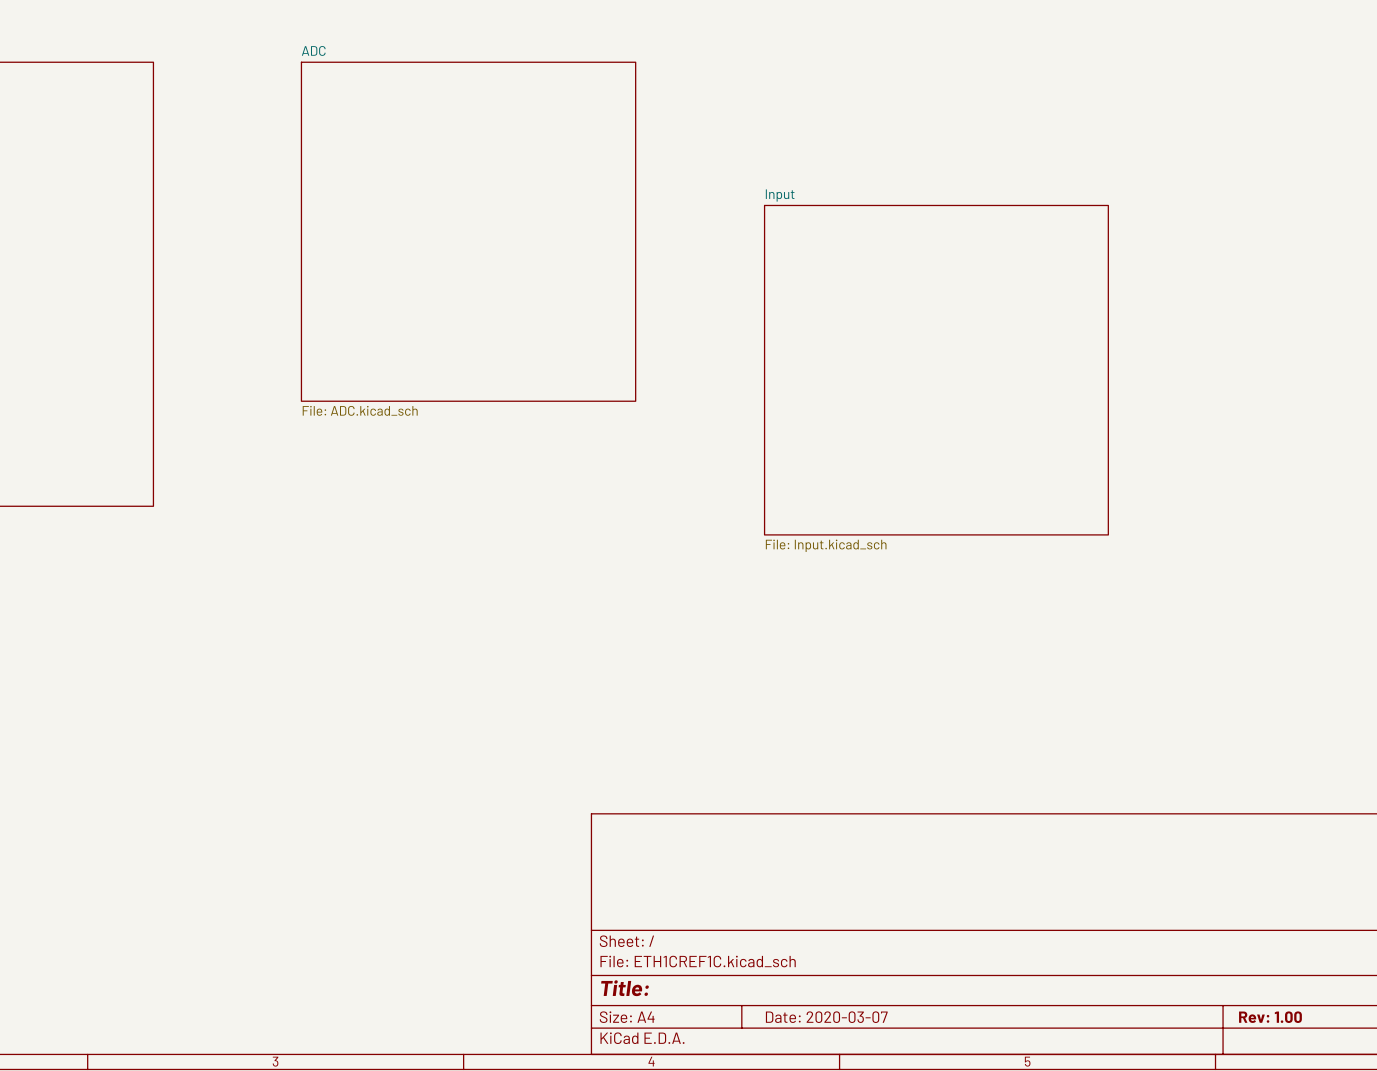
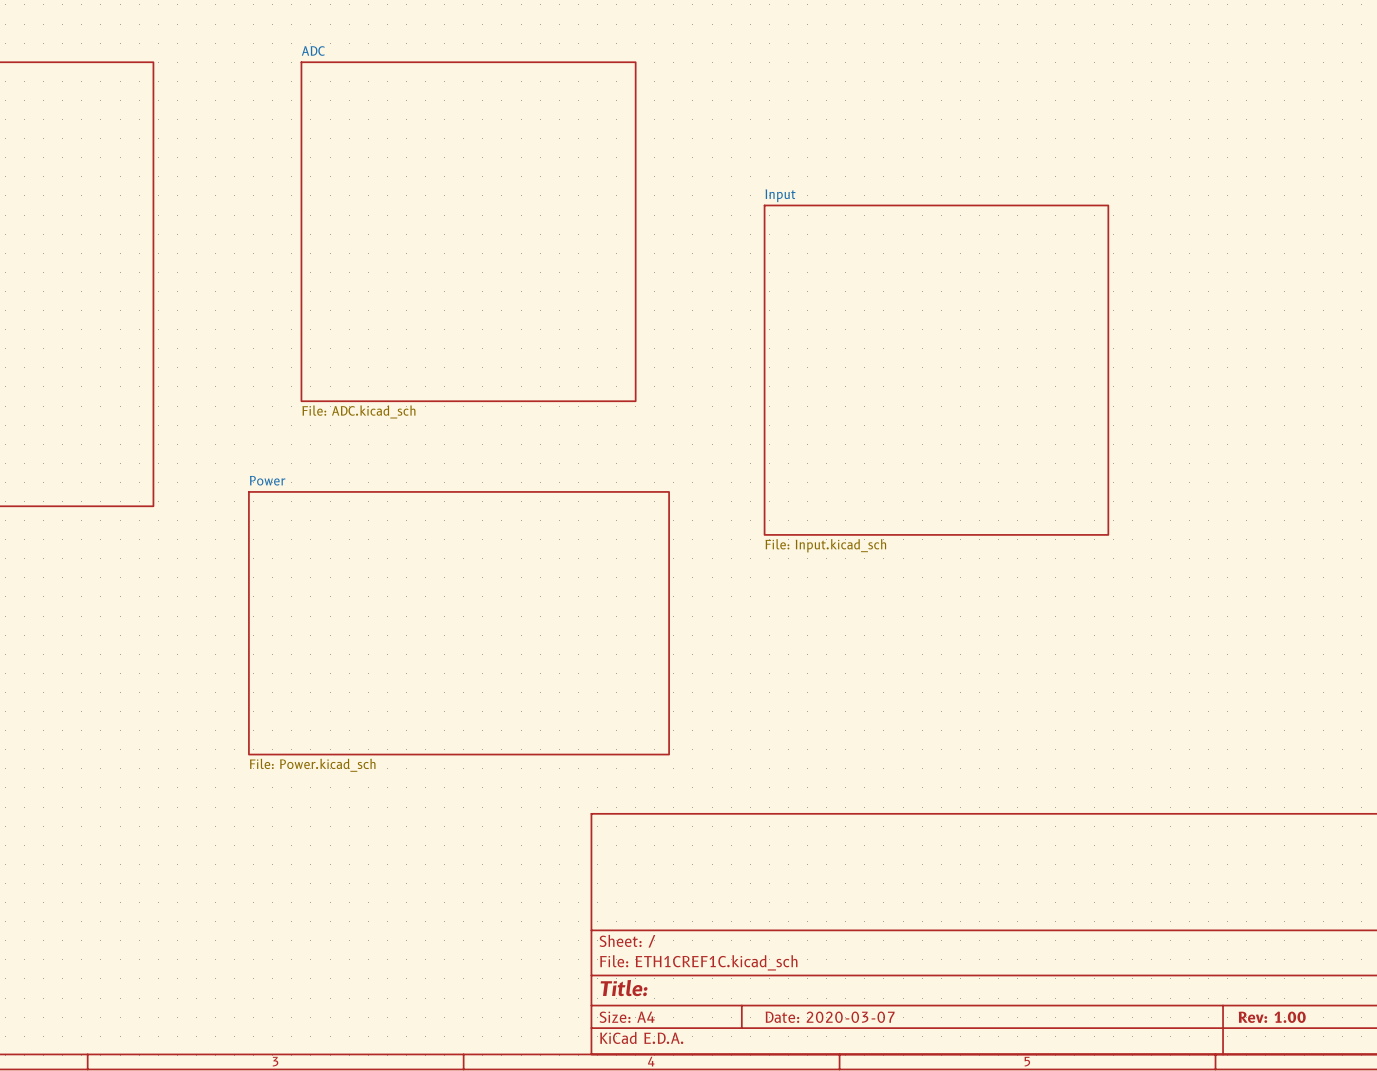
sheet Power: none -> File: Power.kicad_sch (459, 623)

